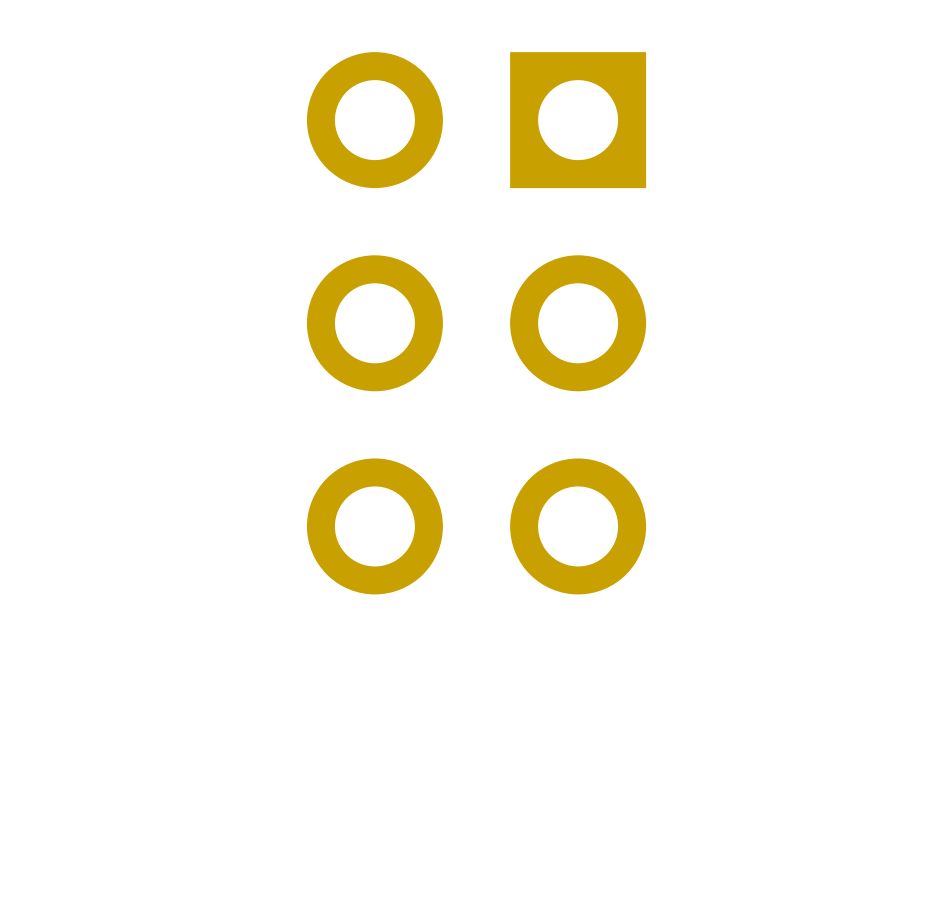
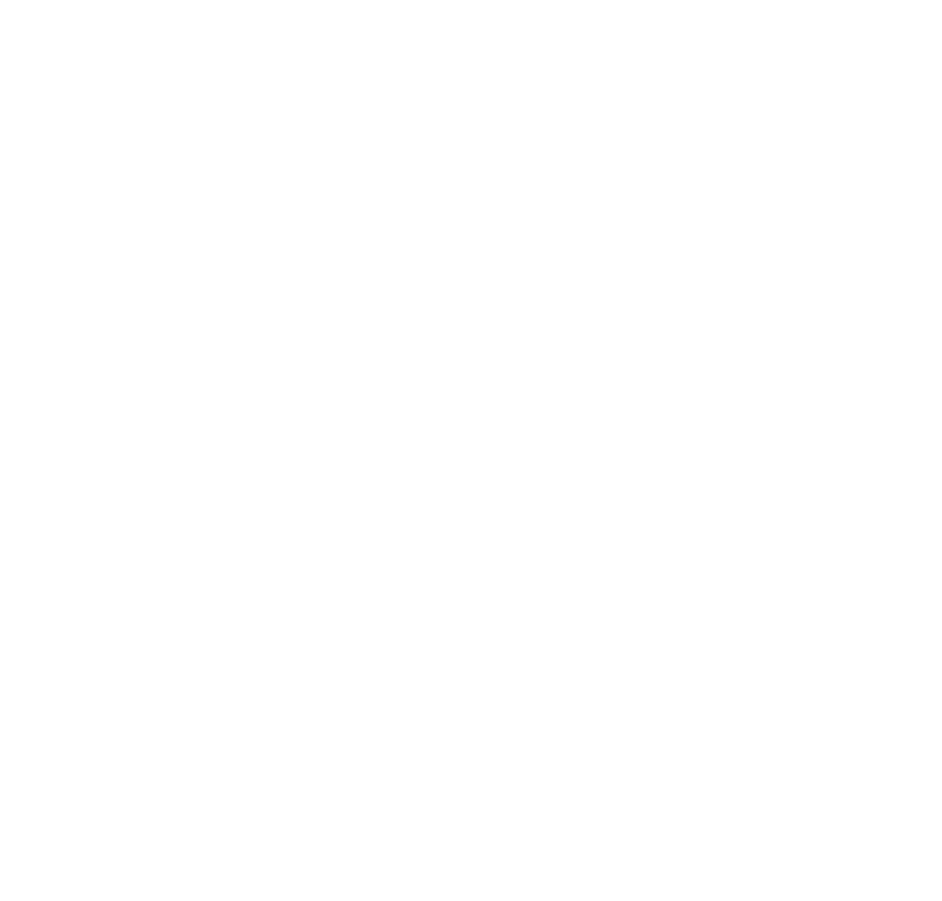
part: (476, 323) -> none

